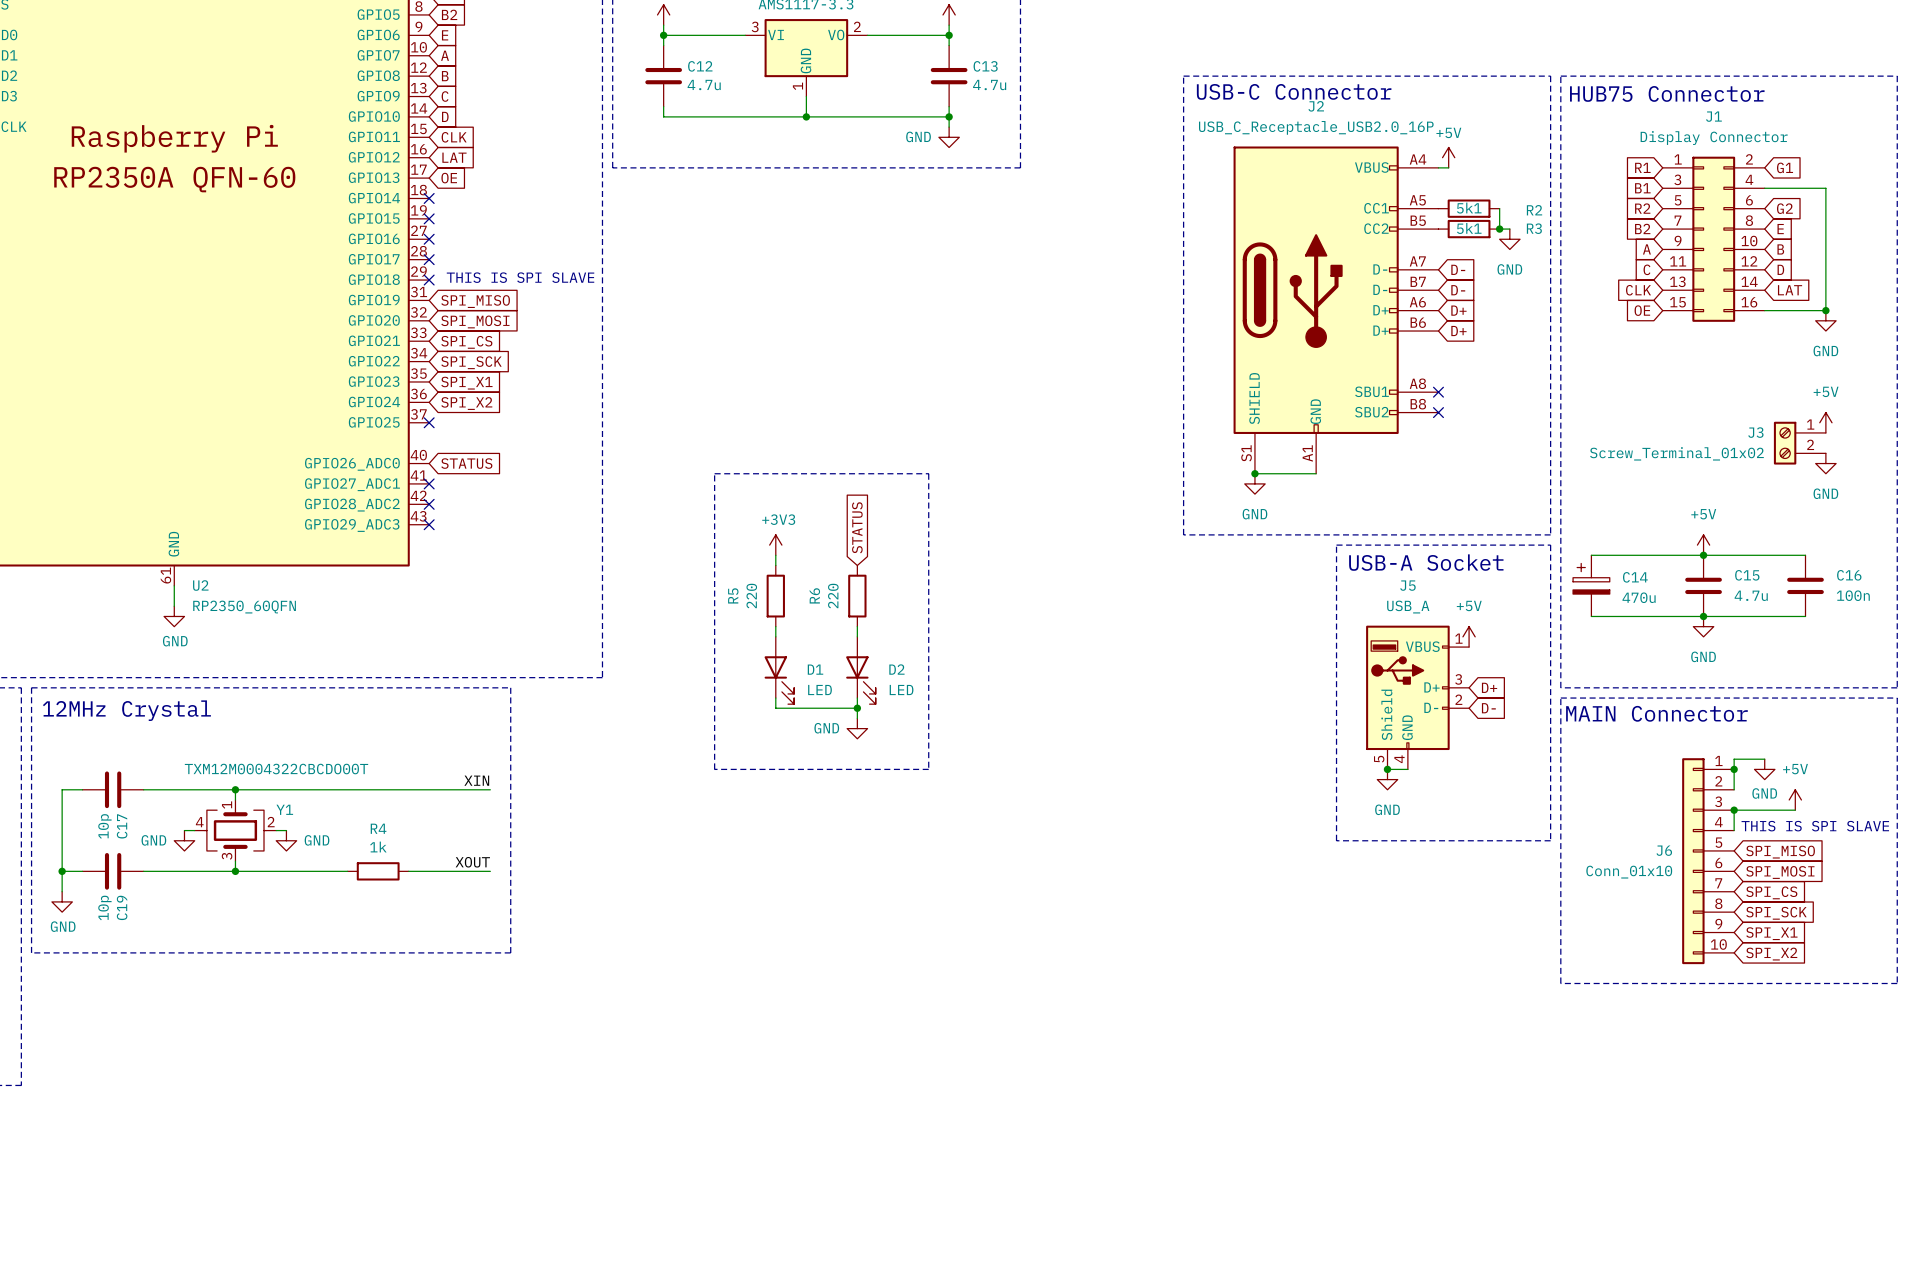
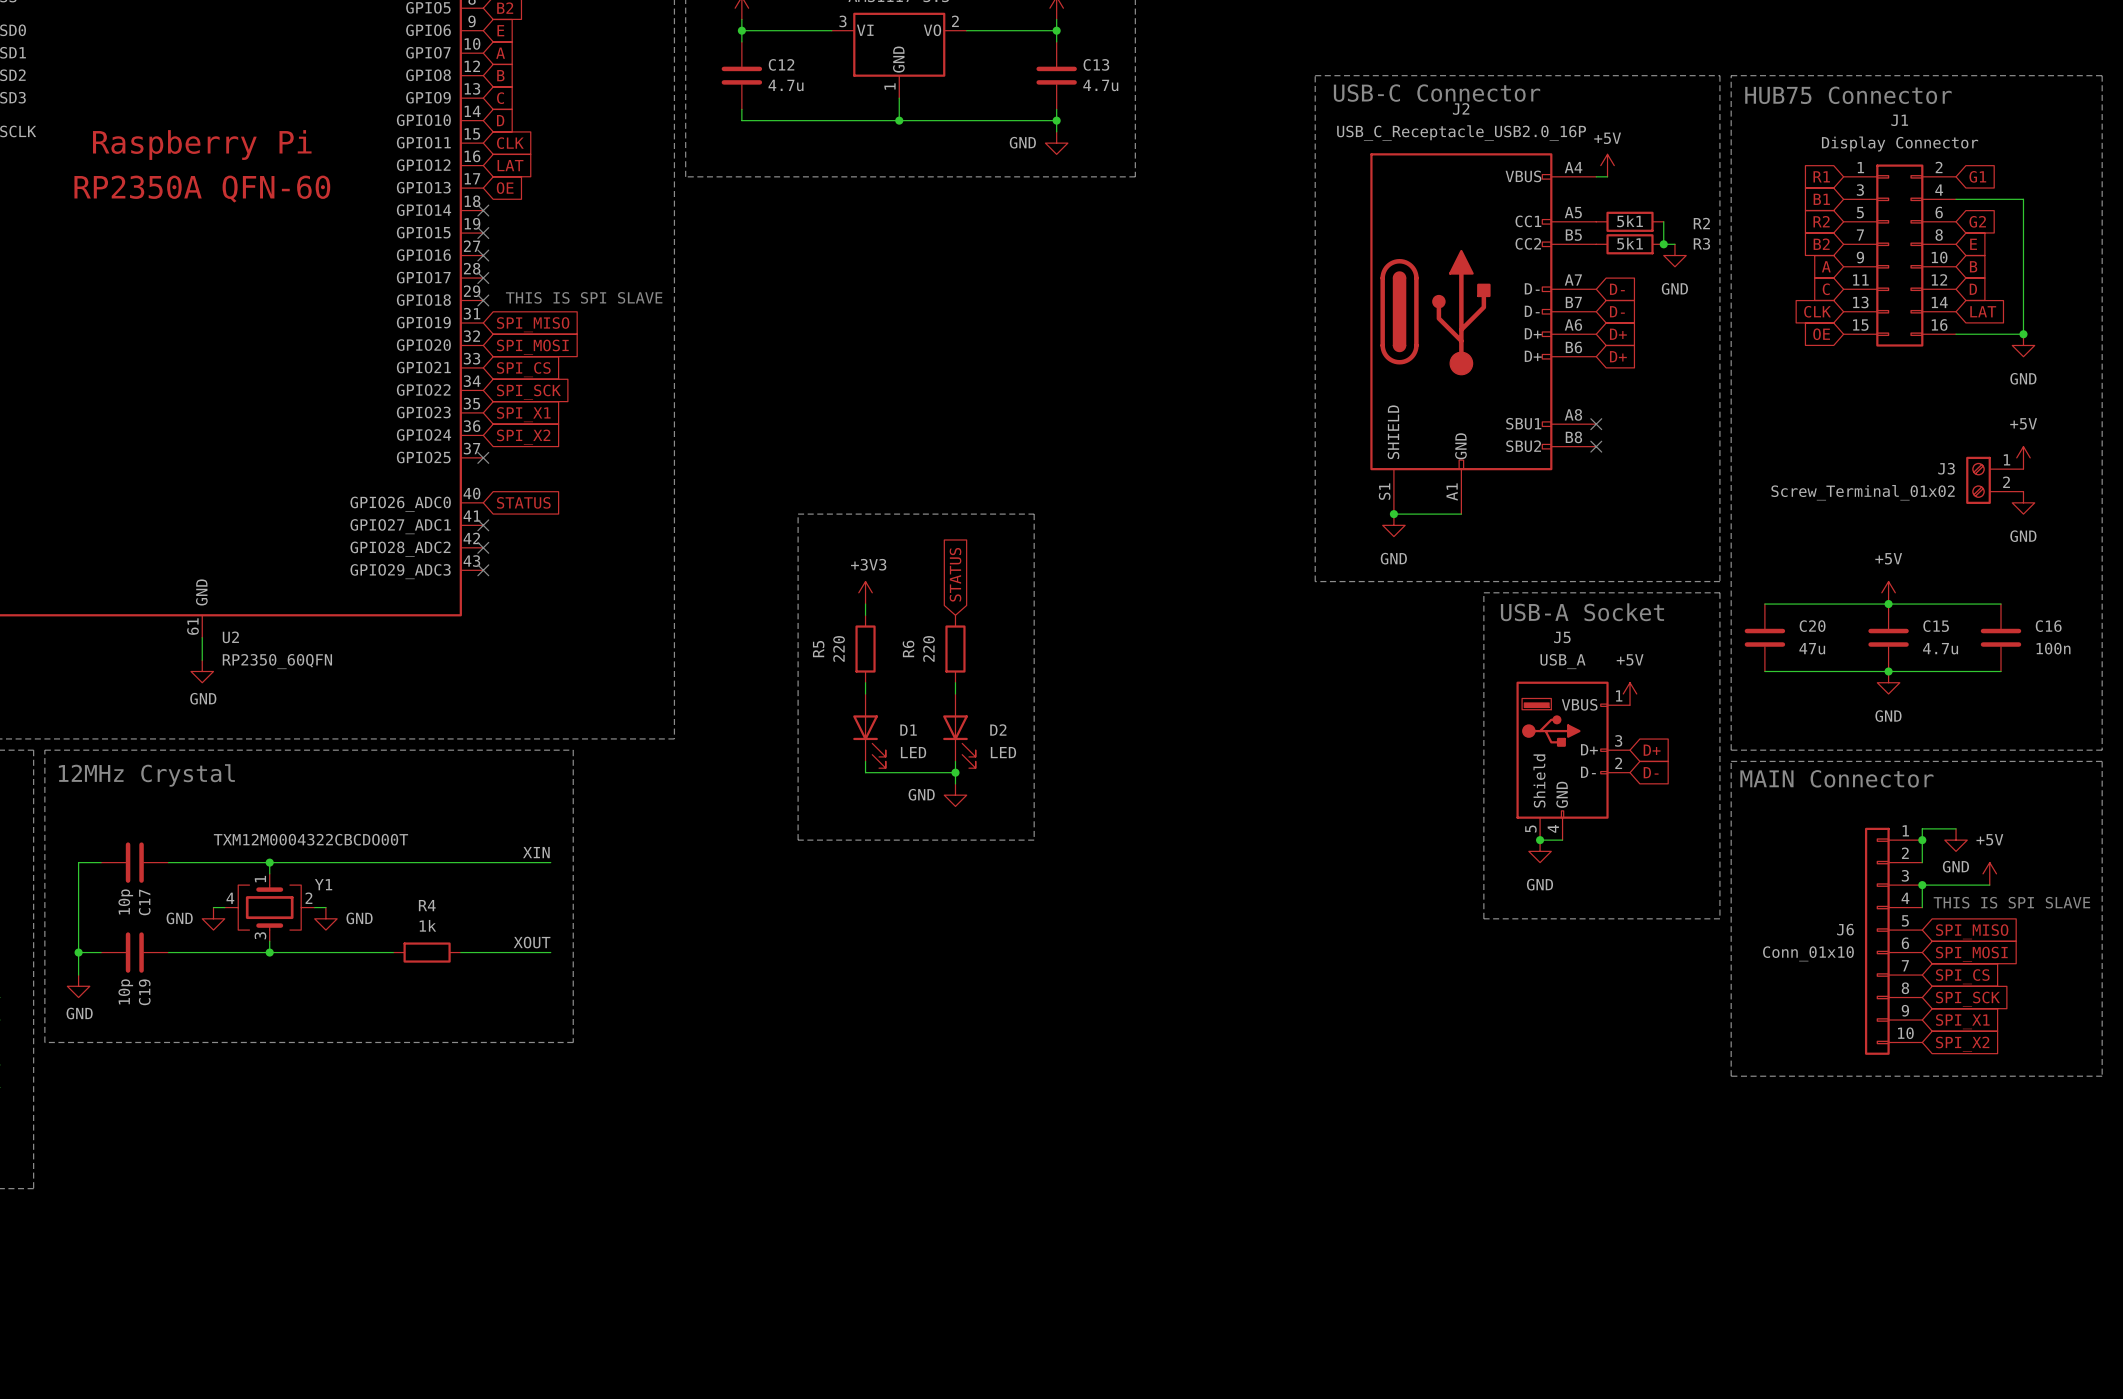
C14: 470u (1591, 585) -> none
C20: none -> 47u (1764, 637)

